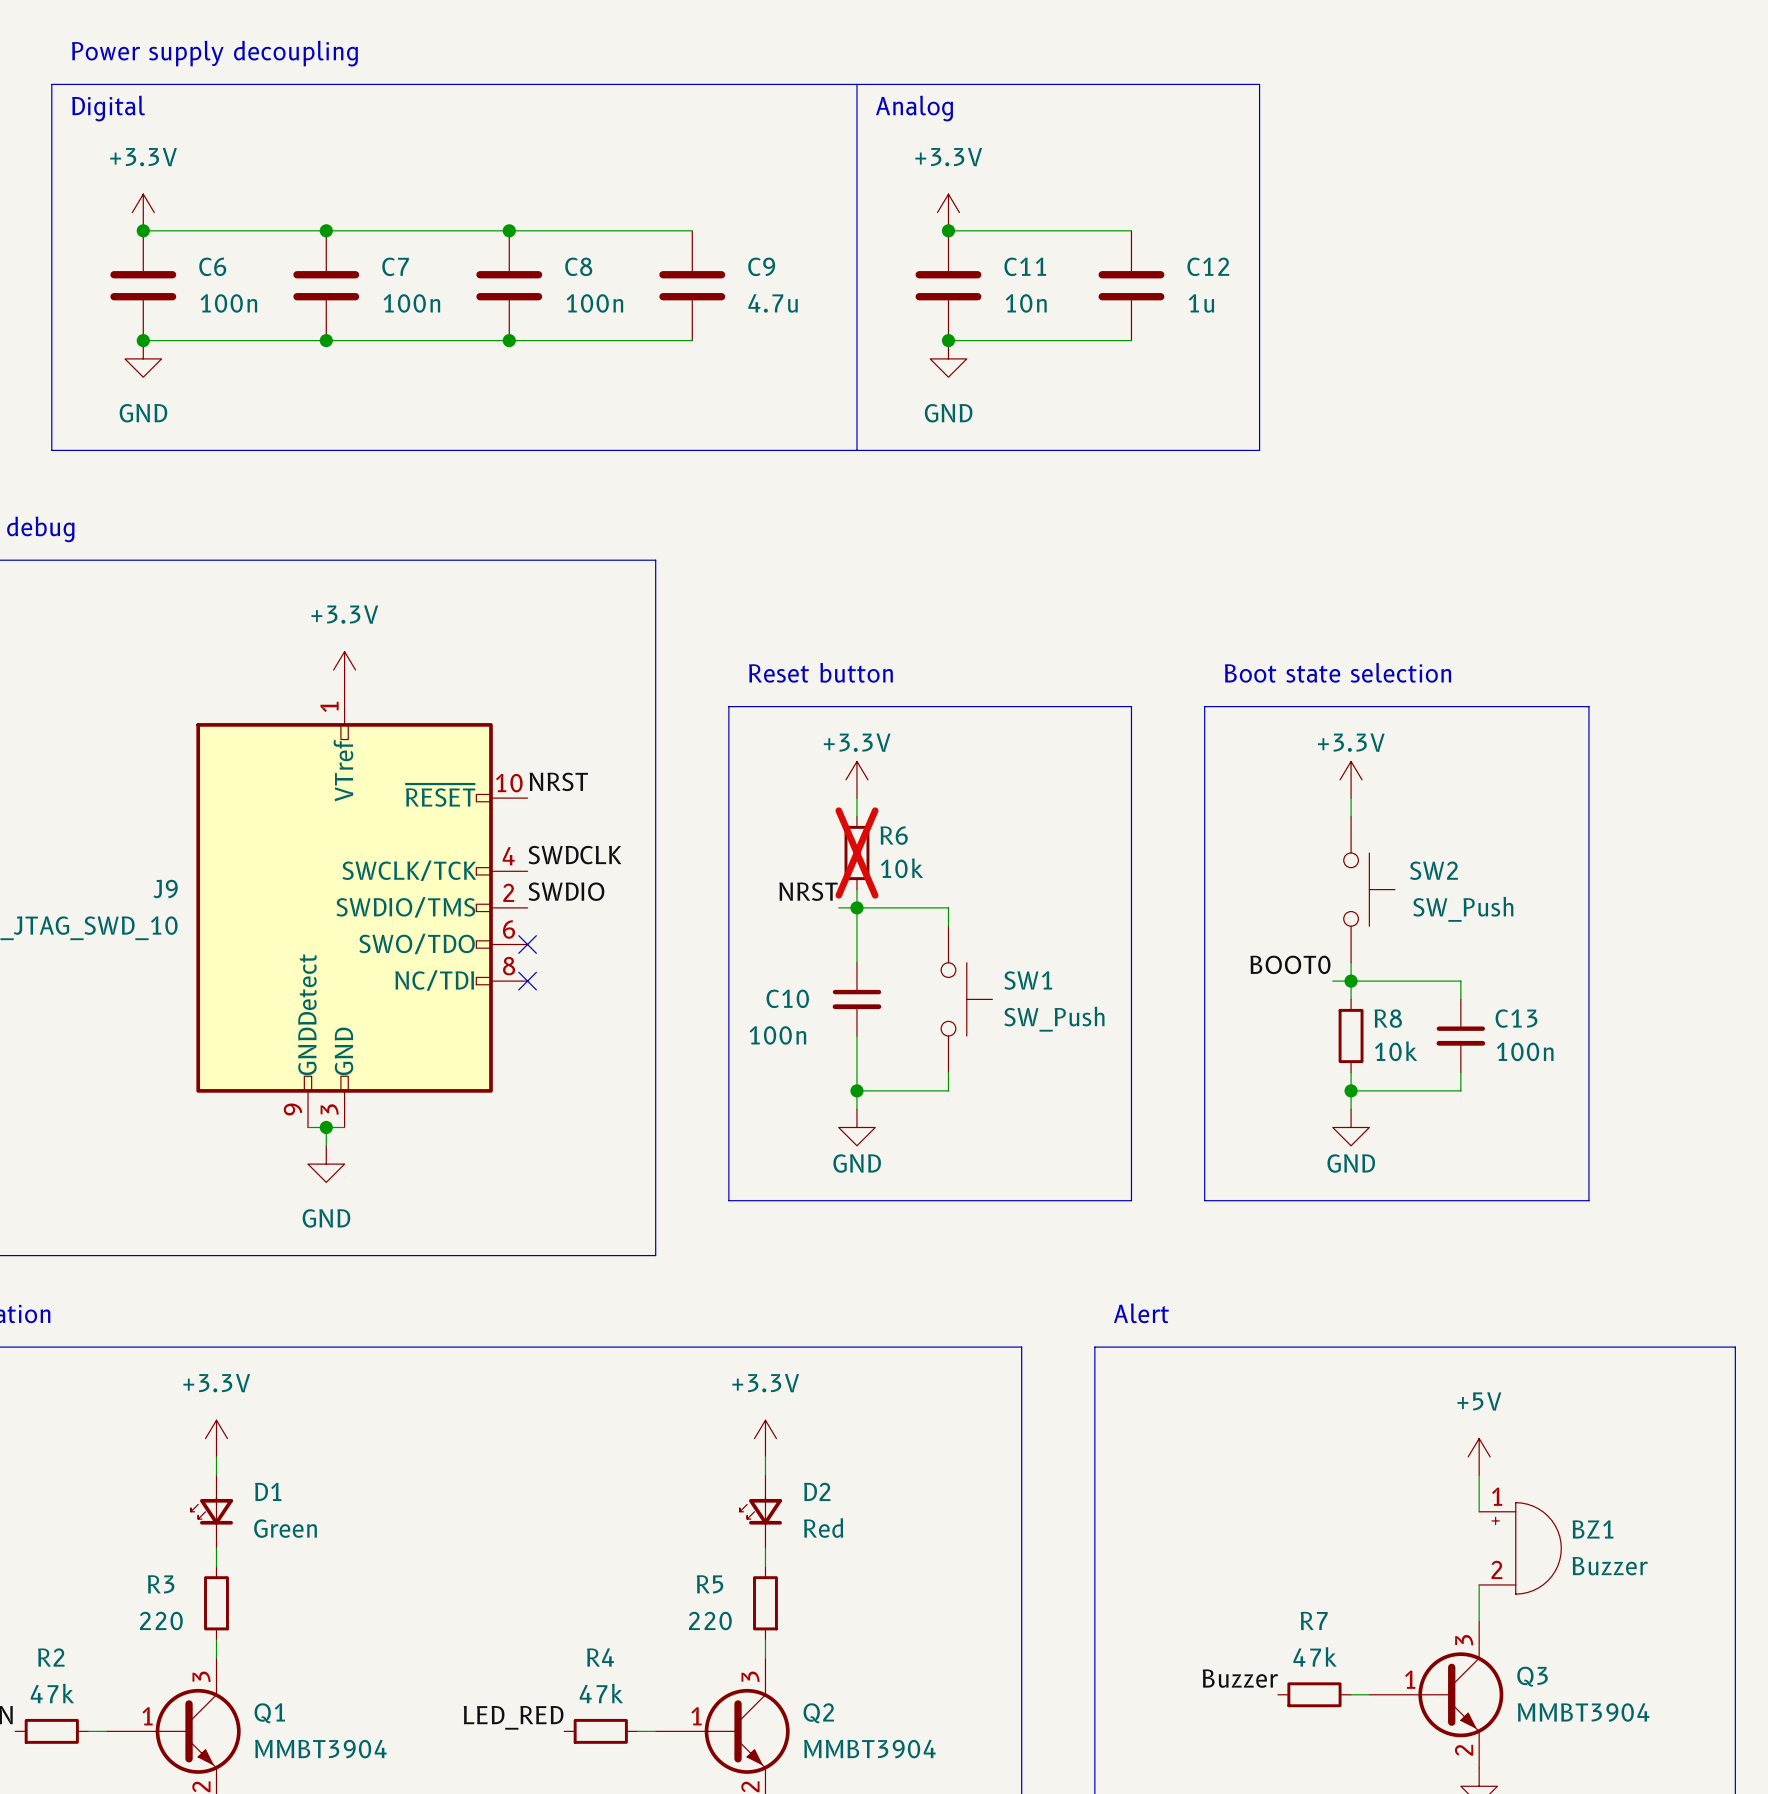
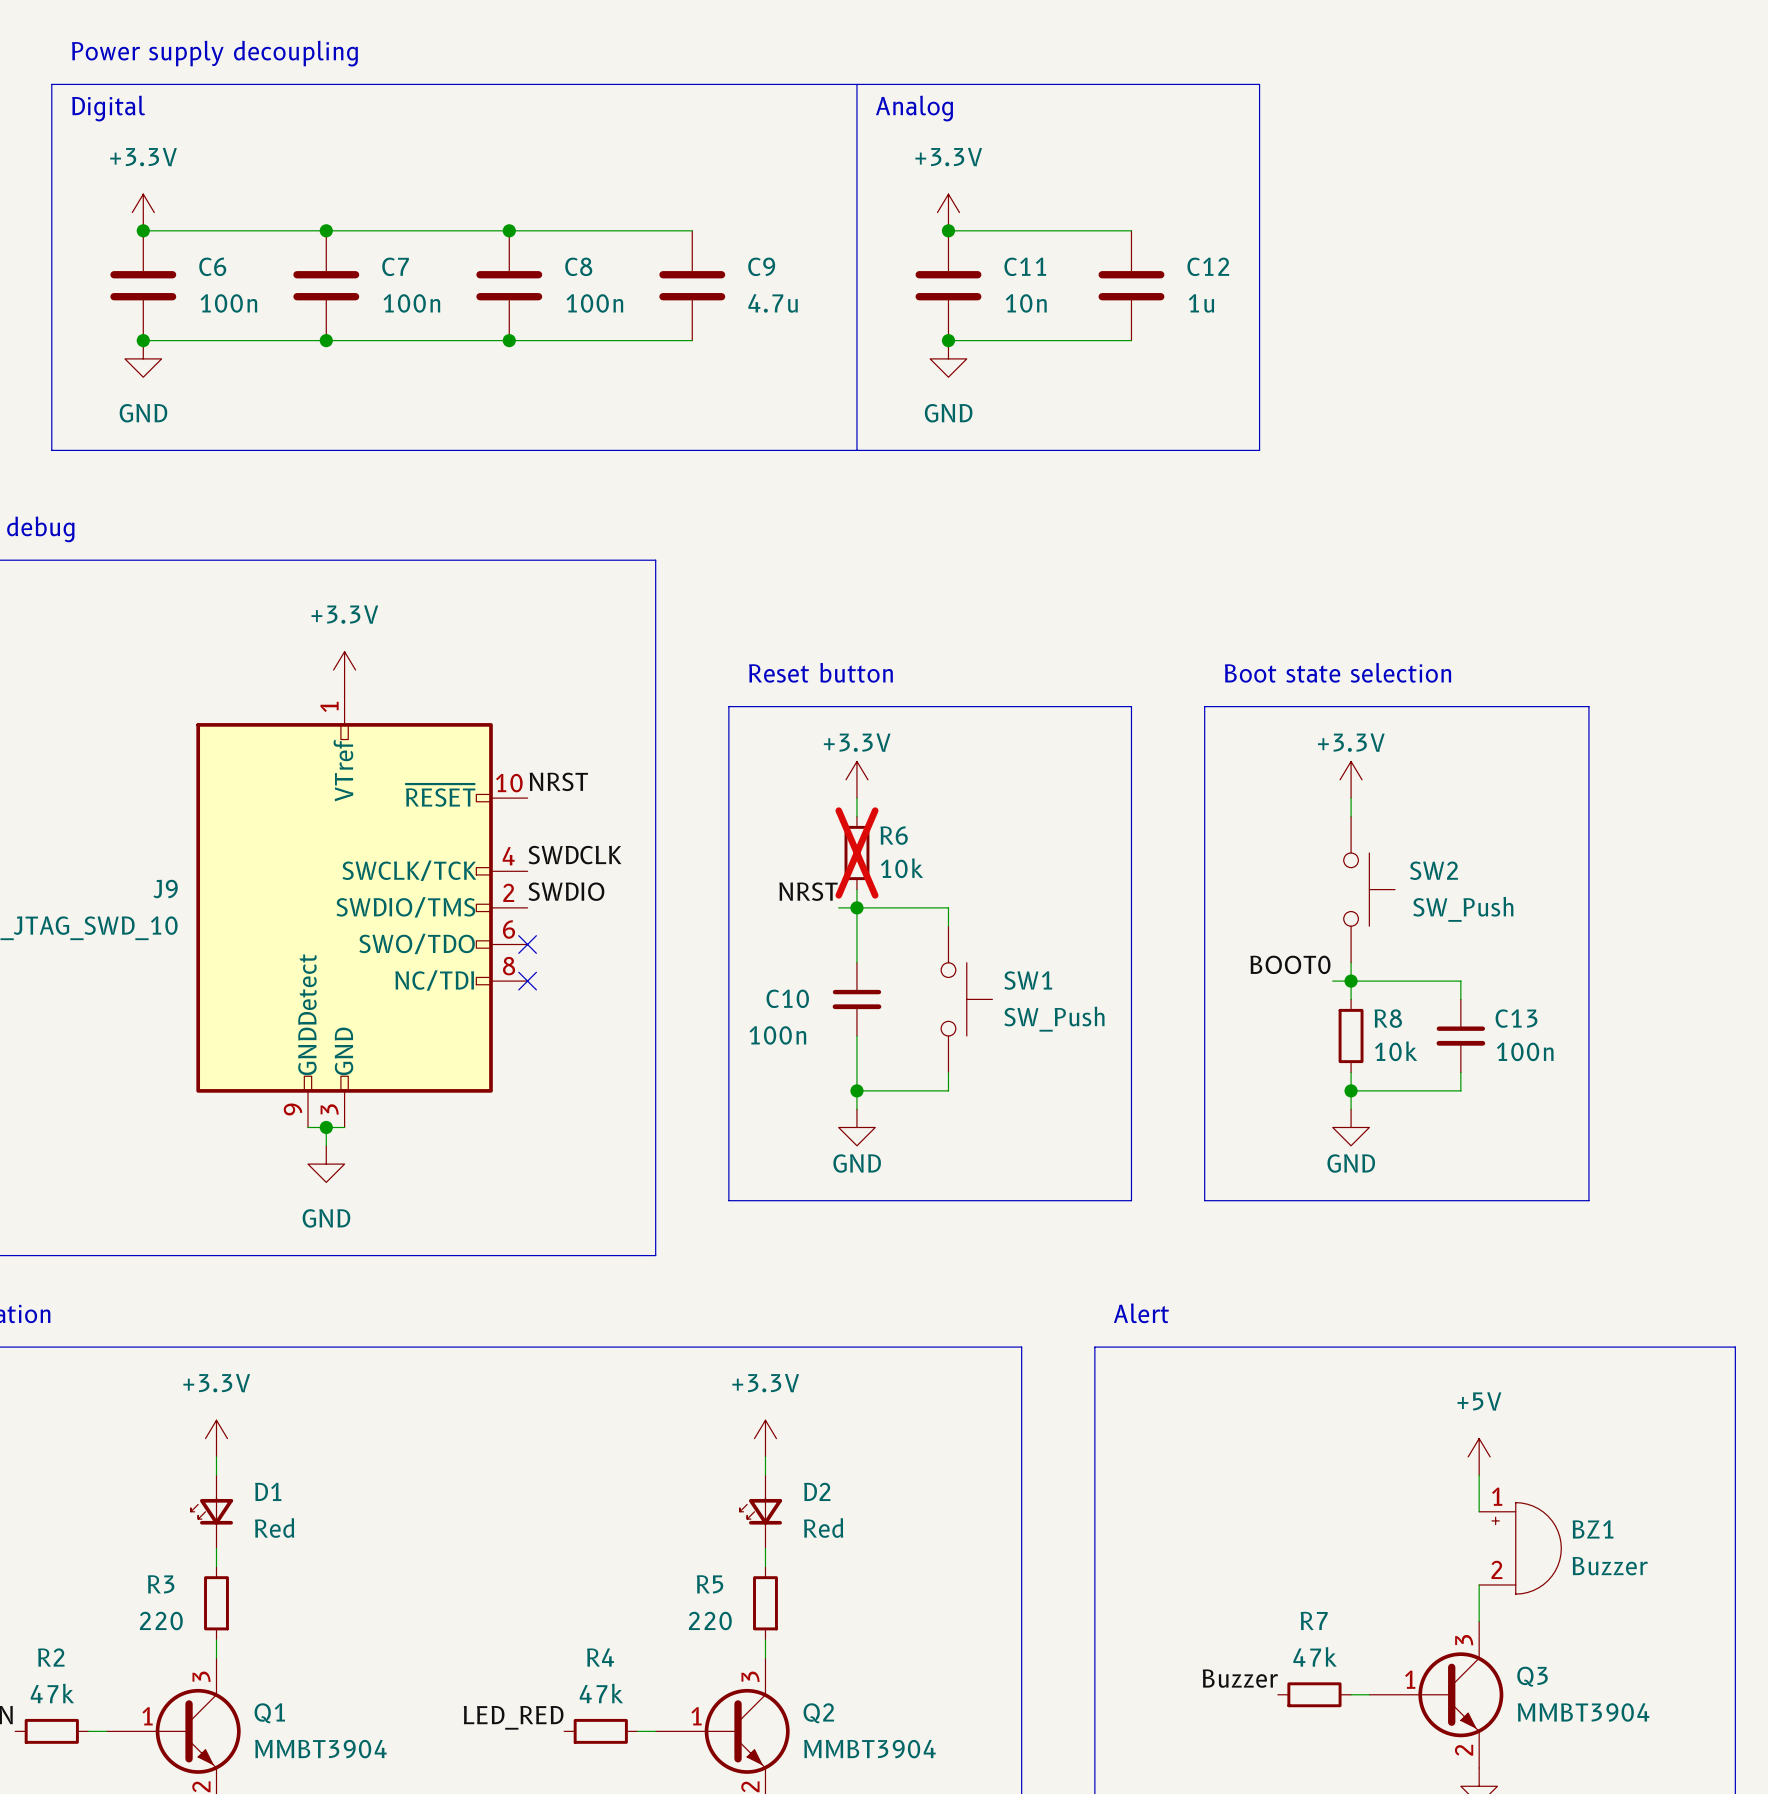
D1 value: Green (285, 1528) -> Red (274, 1527)

